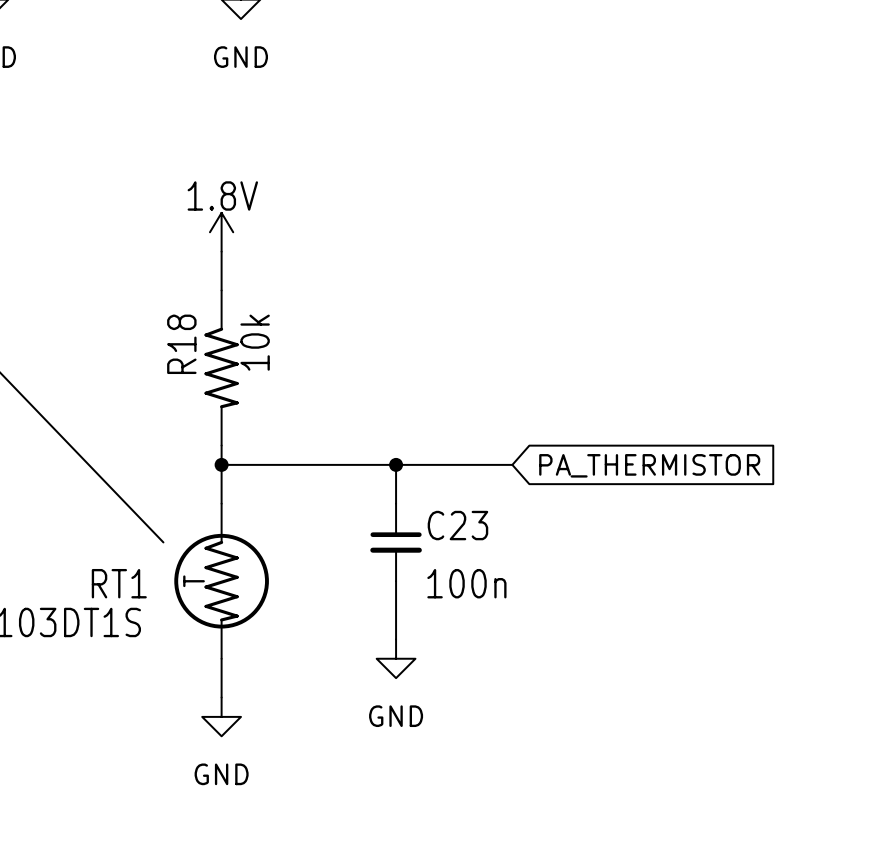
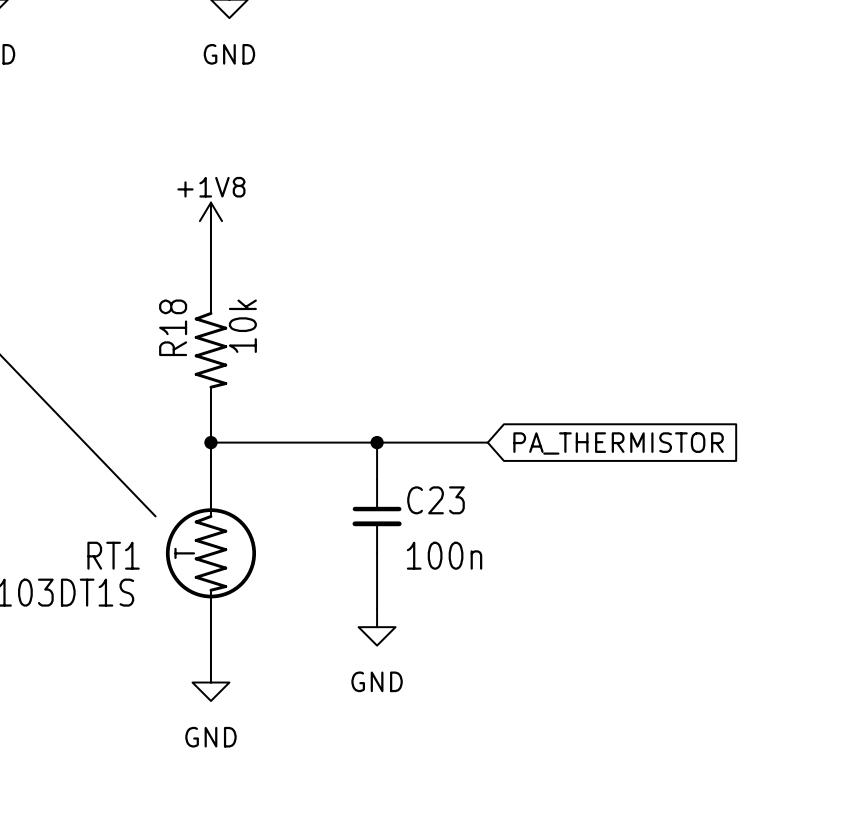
power symbol: 1.8V (221, 232) -> +1V8 (210, 221)

